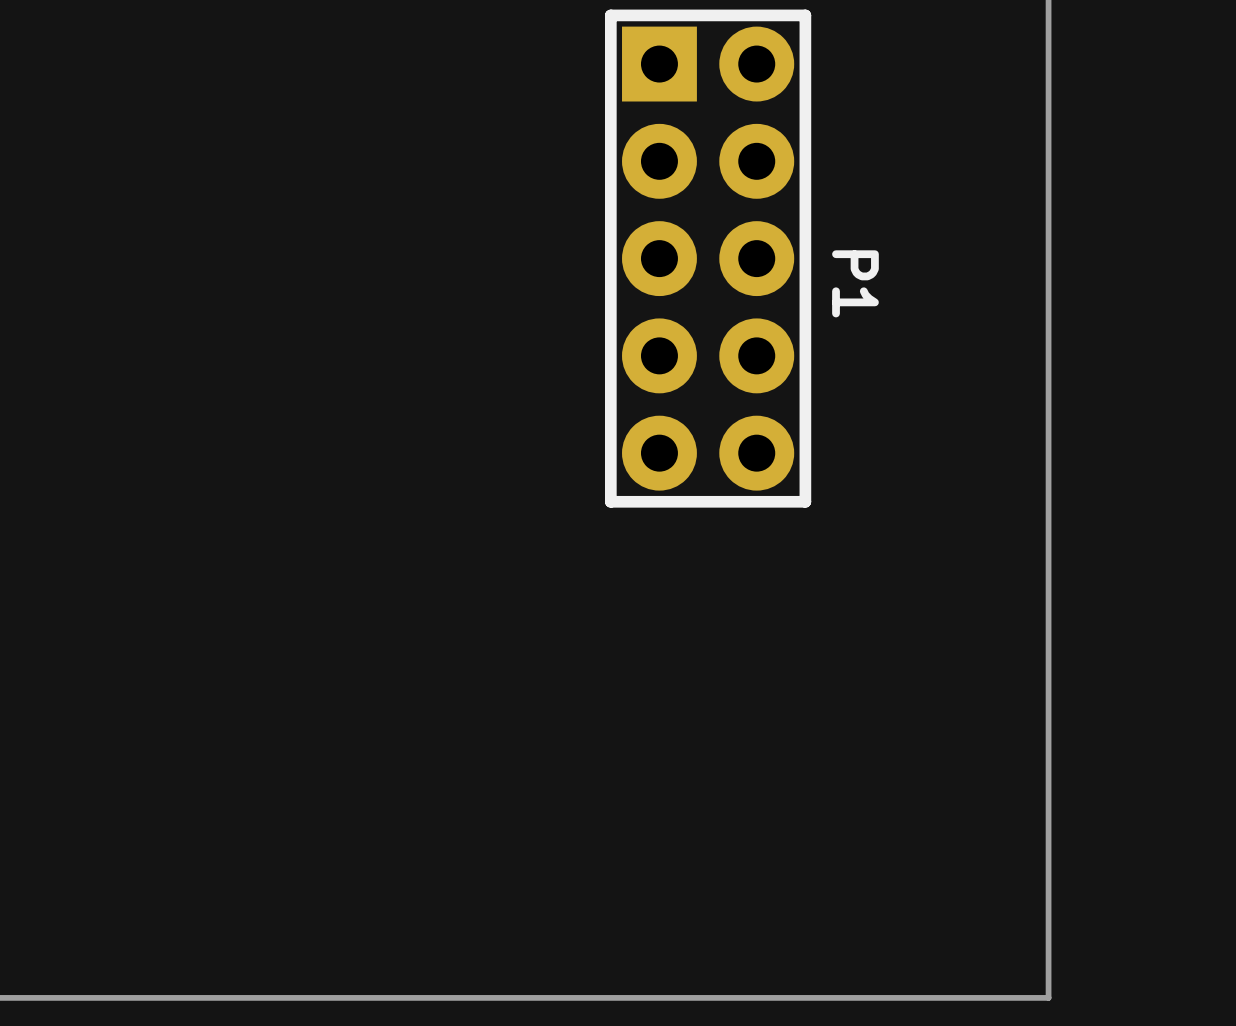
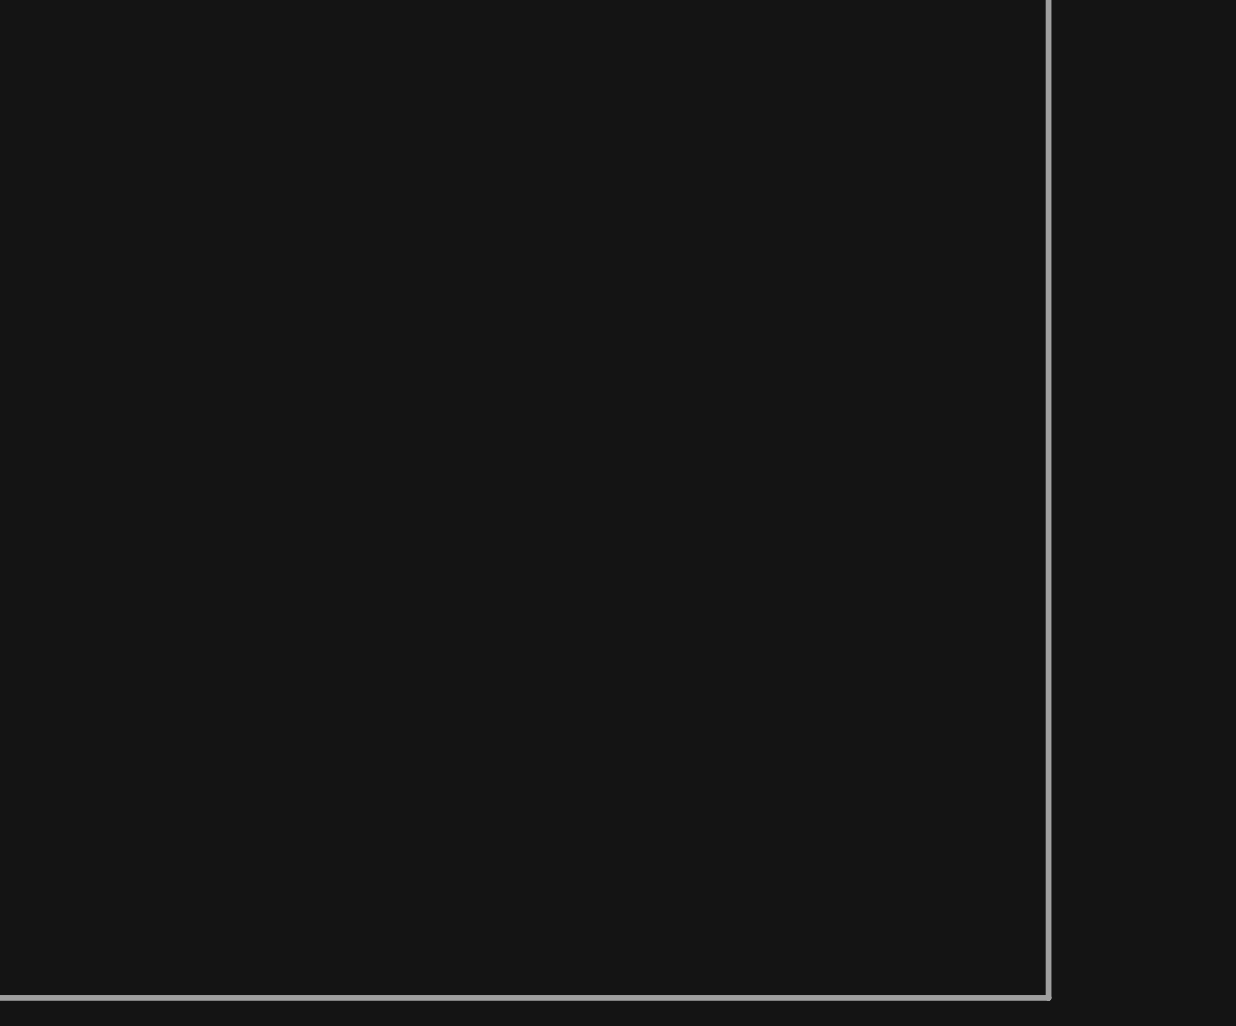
P1: (708, 258) -> none

